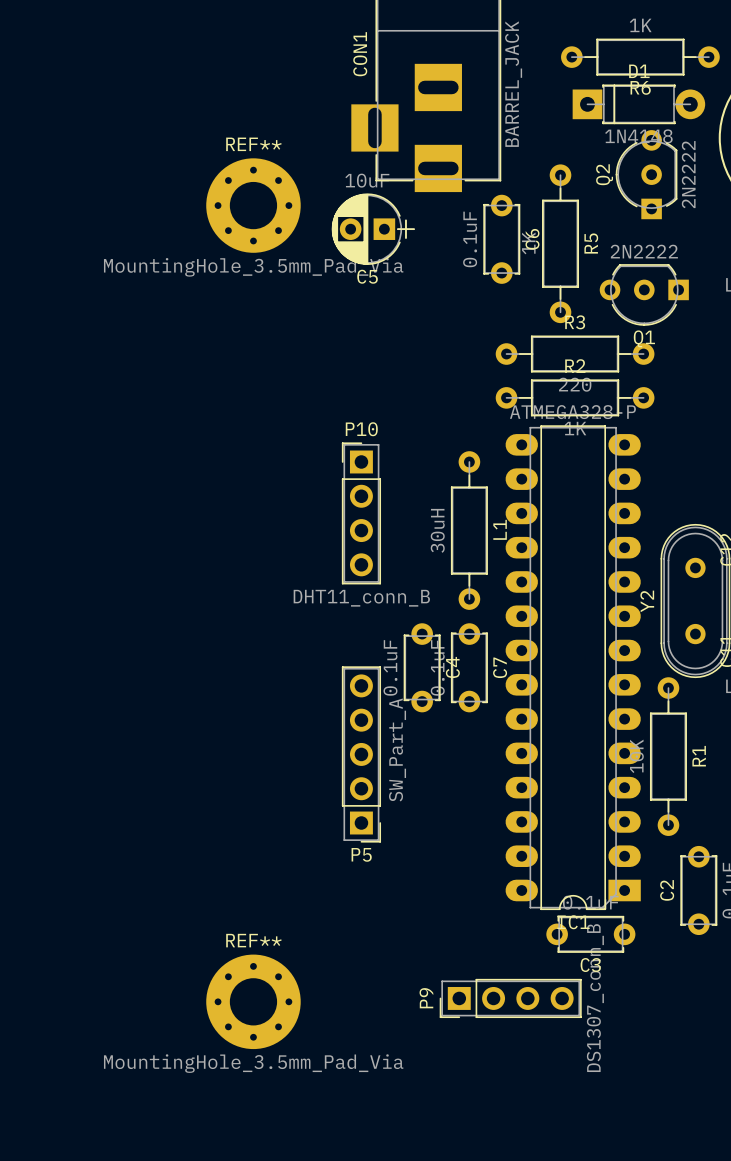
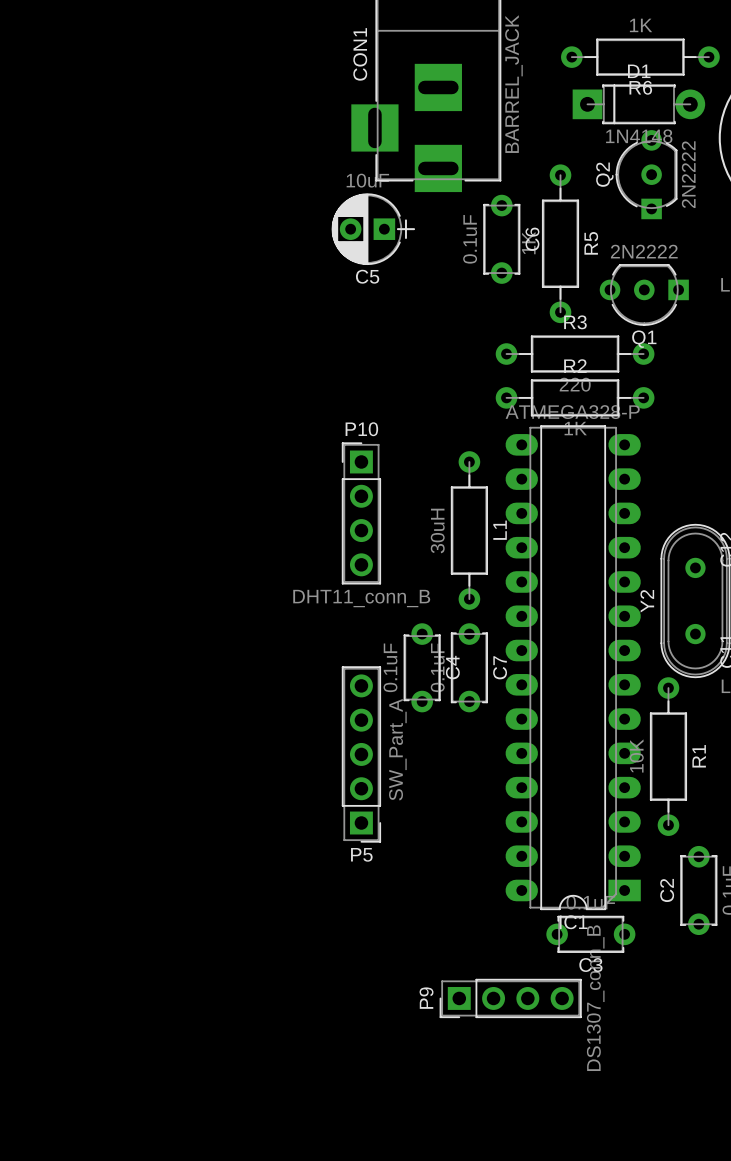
REF**: MountingHole_3.5mm_Pad_Via (253, 205) -> none
REF**: MountingHole_3.5mm_Pad_Via (253, 1001) -> none

